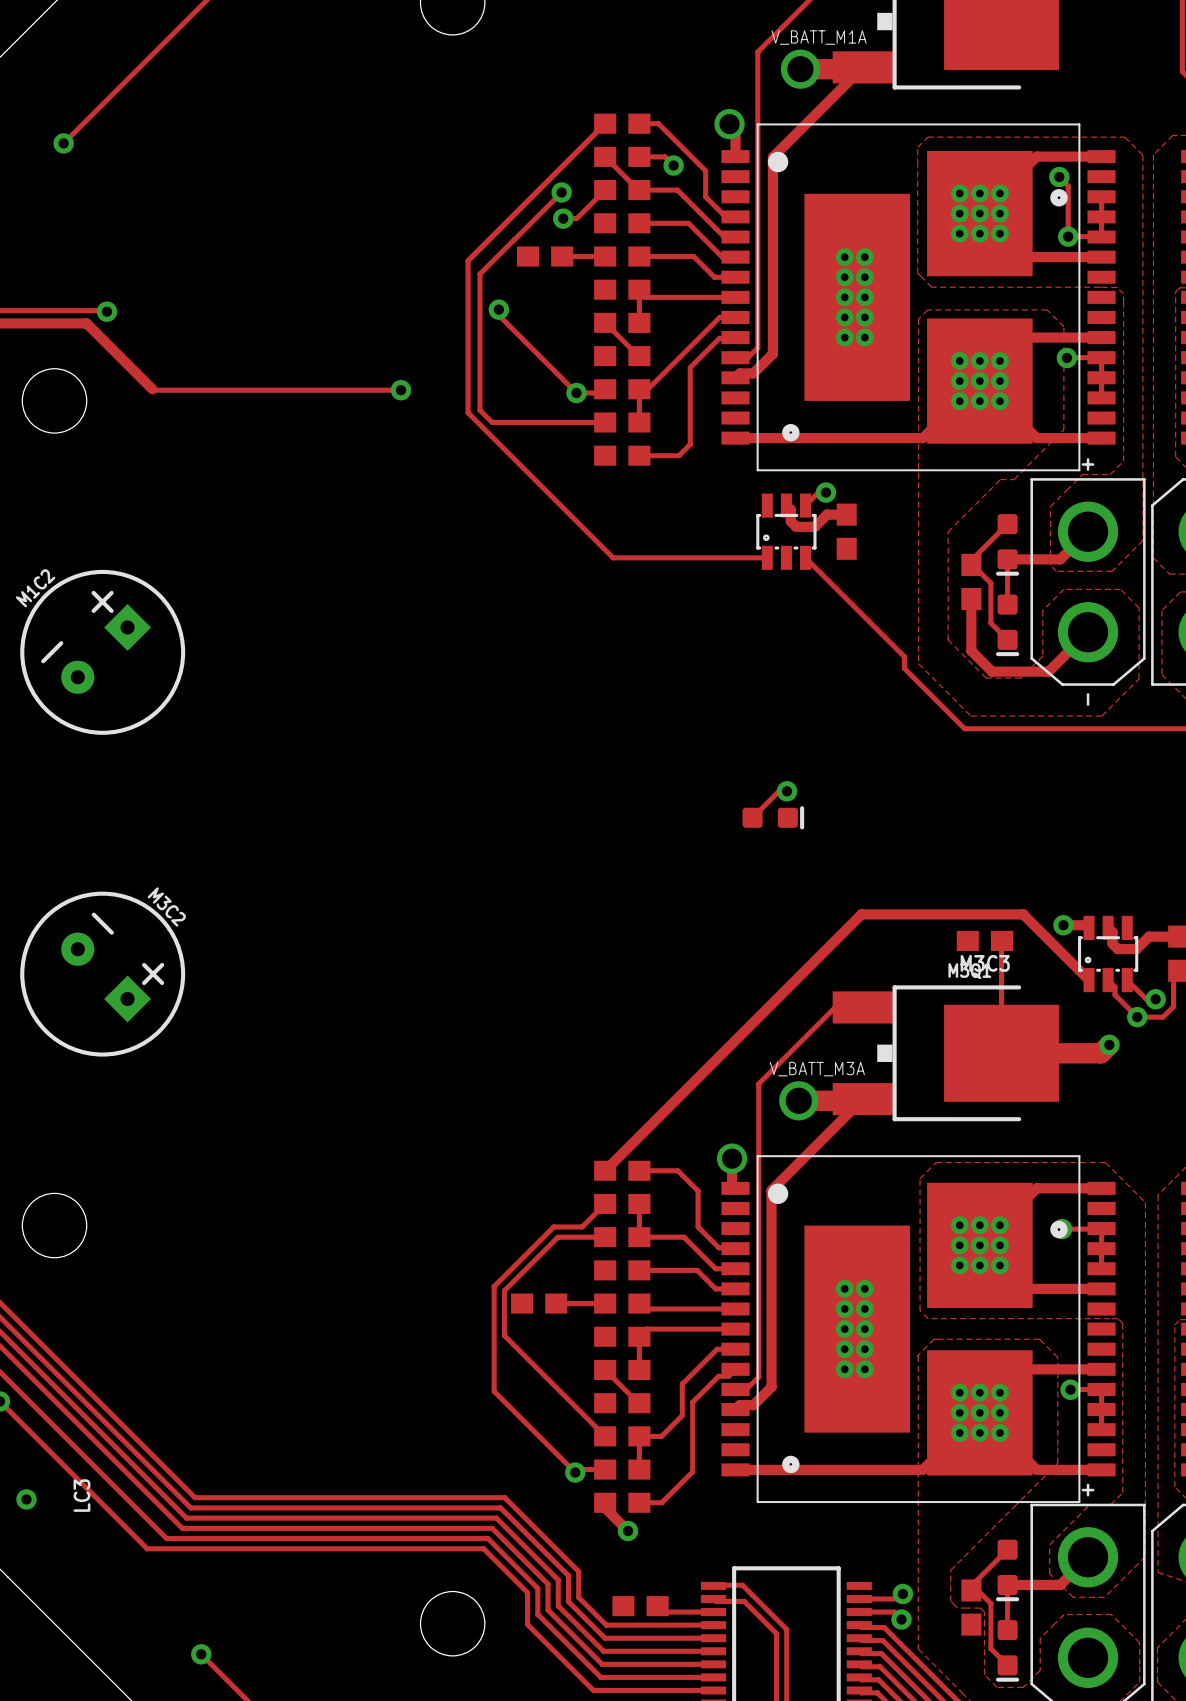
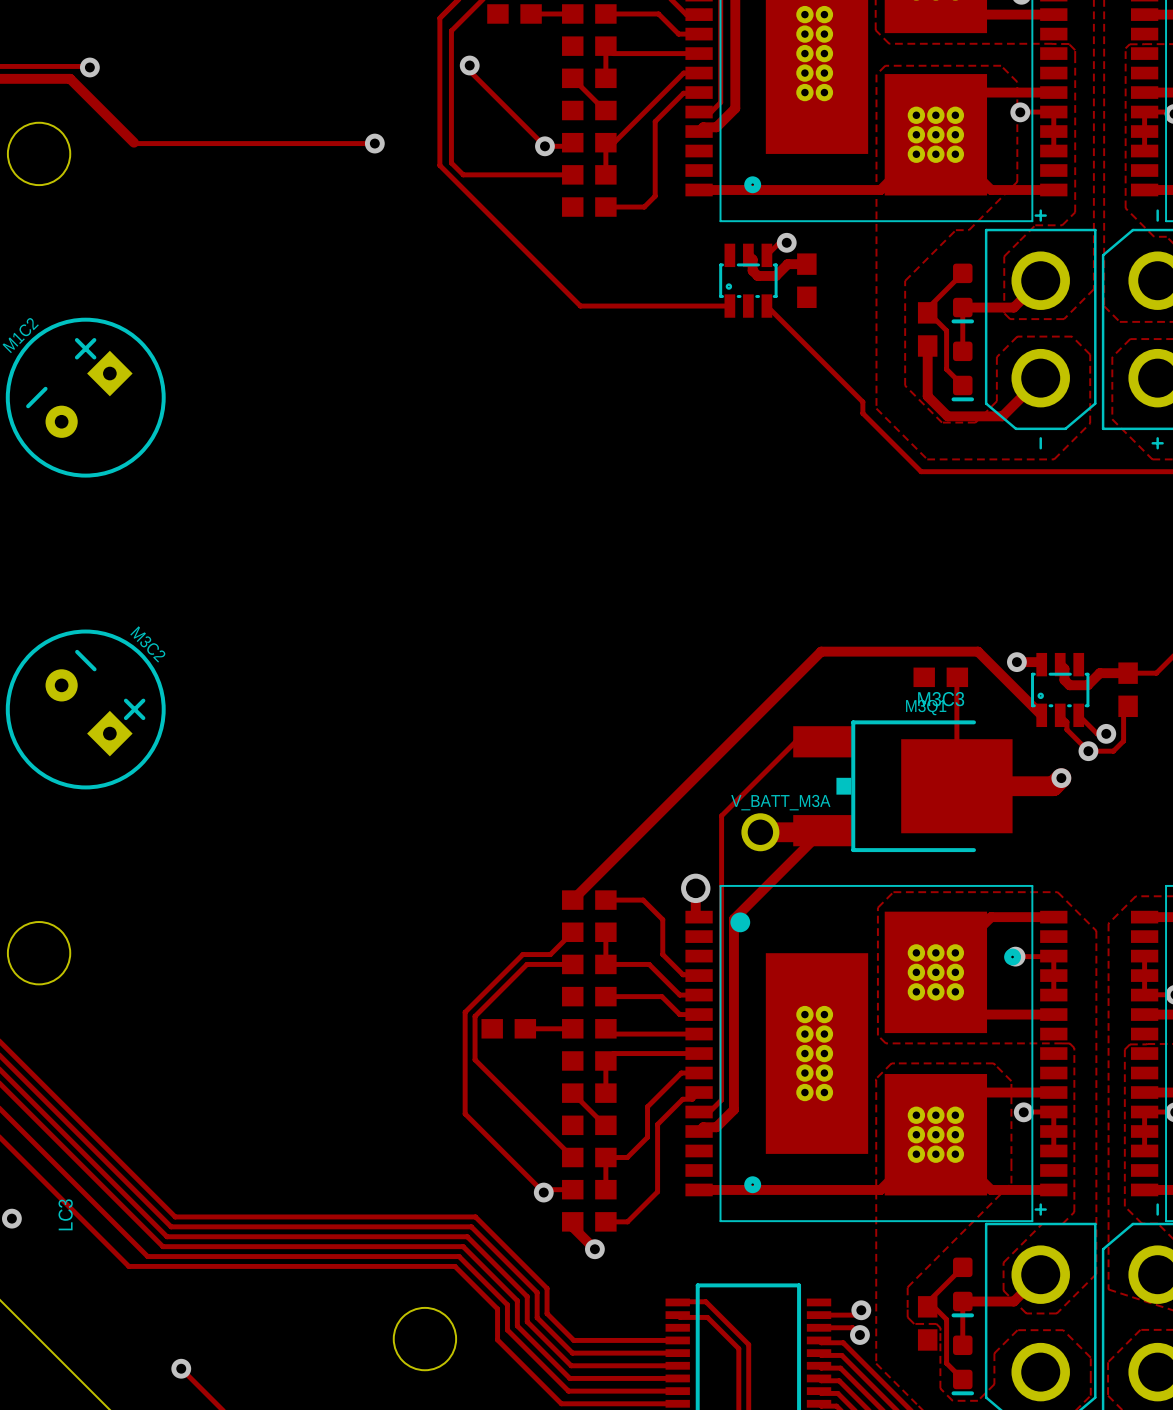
track: (786, 791) (779, 791) (752, 817) -> none
via: (786, 791) -> none
part: (773, 817) -> none
part: (640, 1606) -> none
track: (657, 1606) (663, 1612) (713, 1612) -> none

